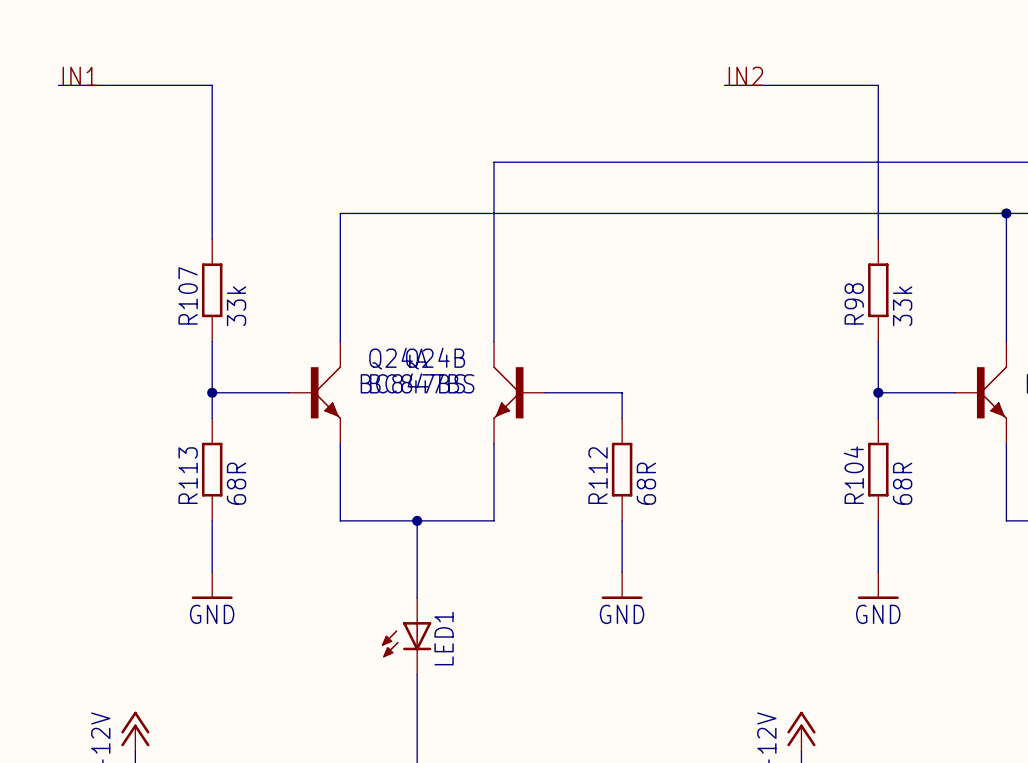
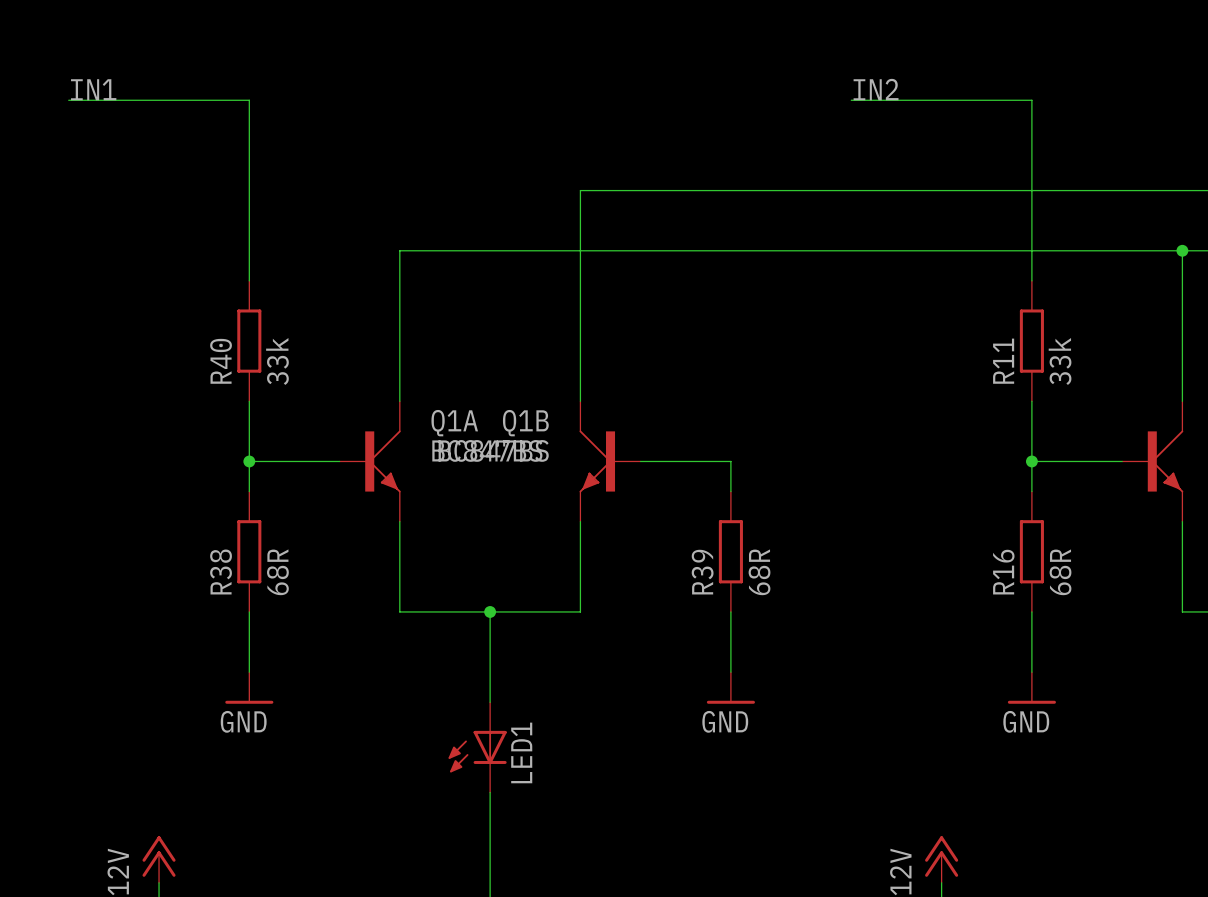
R107 name: R107 (188, 295) -> R40 (221, 361)
R98 name: R98 (854, 303) -> R11 (1003, 361)
Q24A name: Q24A (398, 358) -> Q1A (454, 423)
Q24B name: Q24B (435, 358) -> Q1B (525, 423)
R113 name: R113 (188, 475) -> R38 (221, 571)
R112 name: R112 (598, 475) -> R39 (702, 572)
R104 name: R104 (853, 475) -> R16 (1003, 572)

